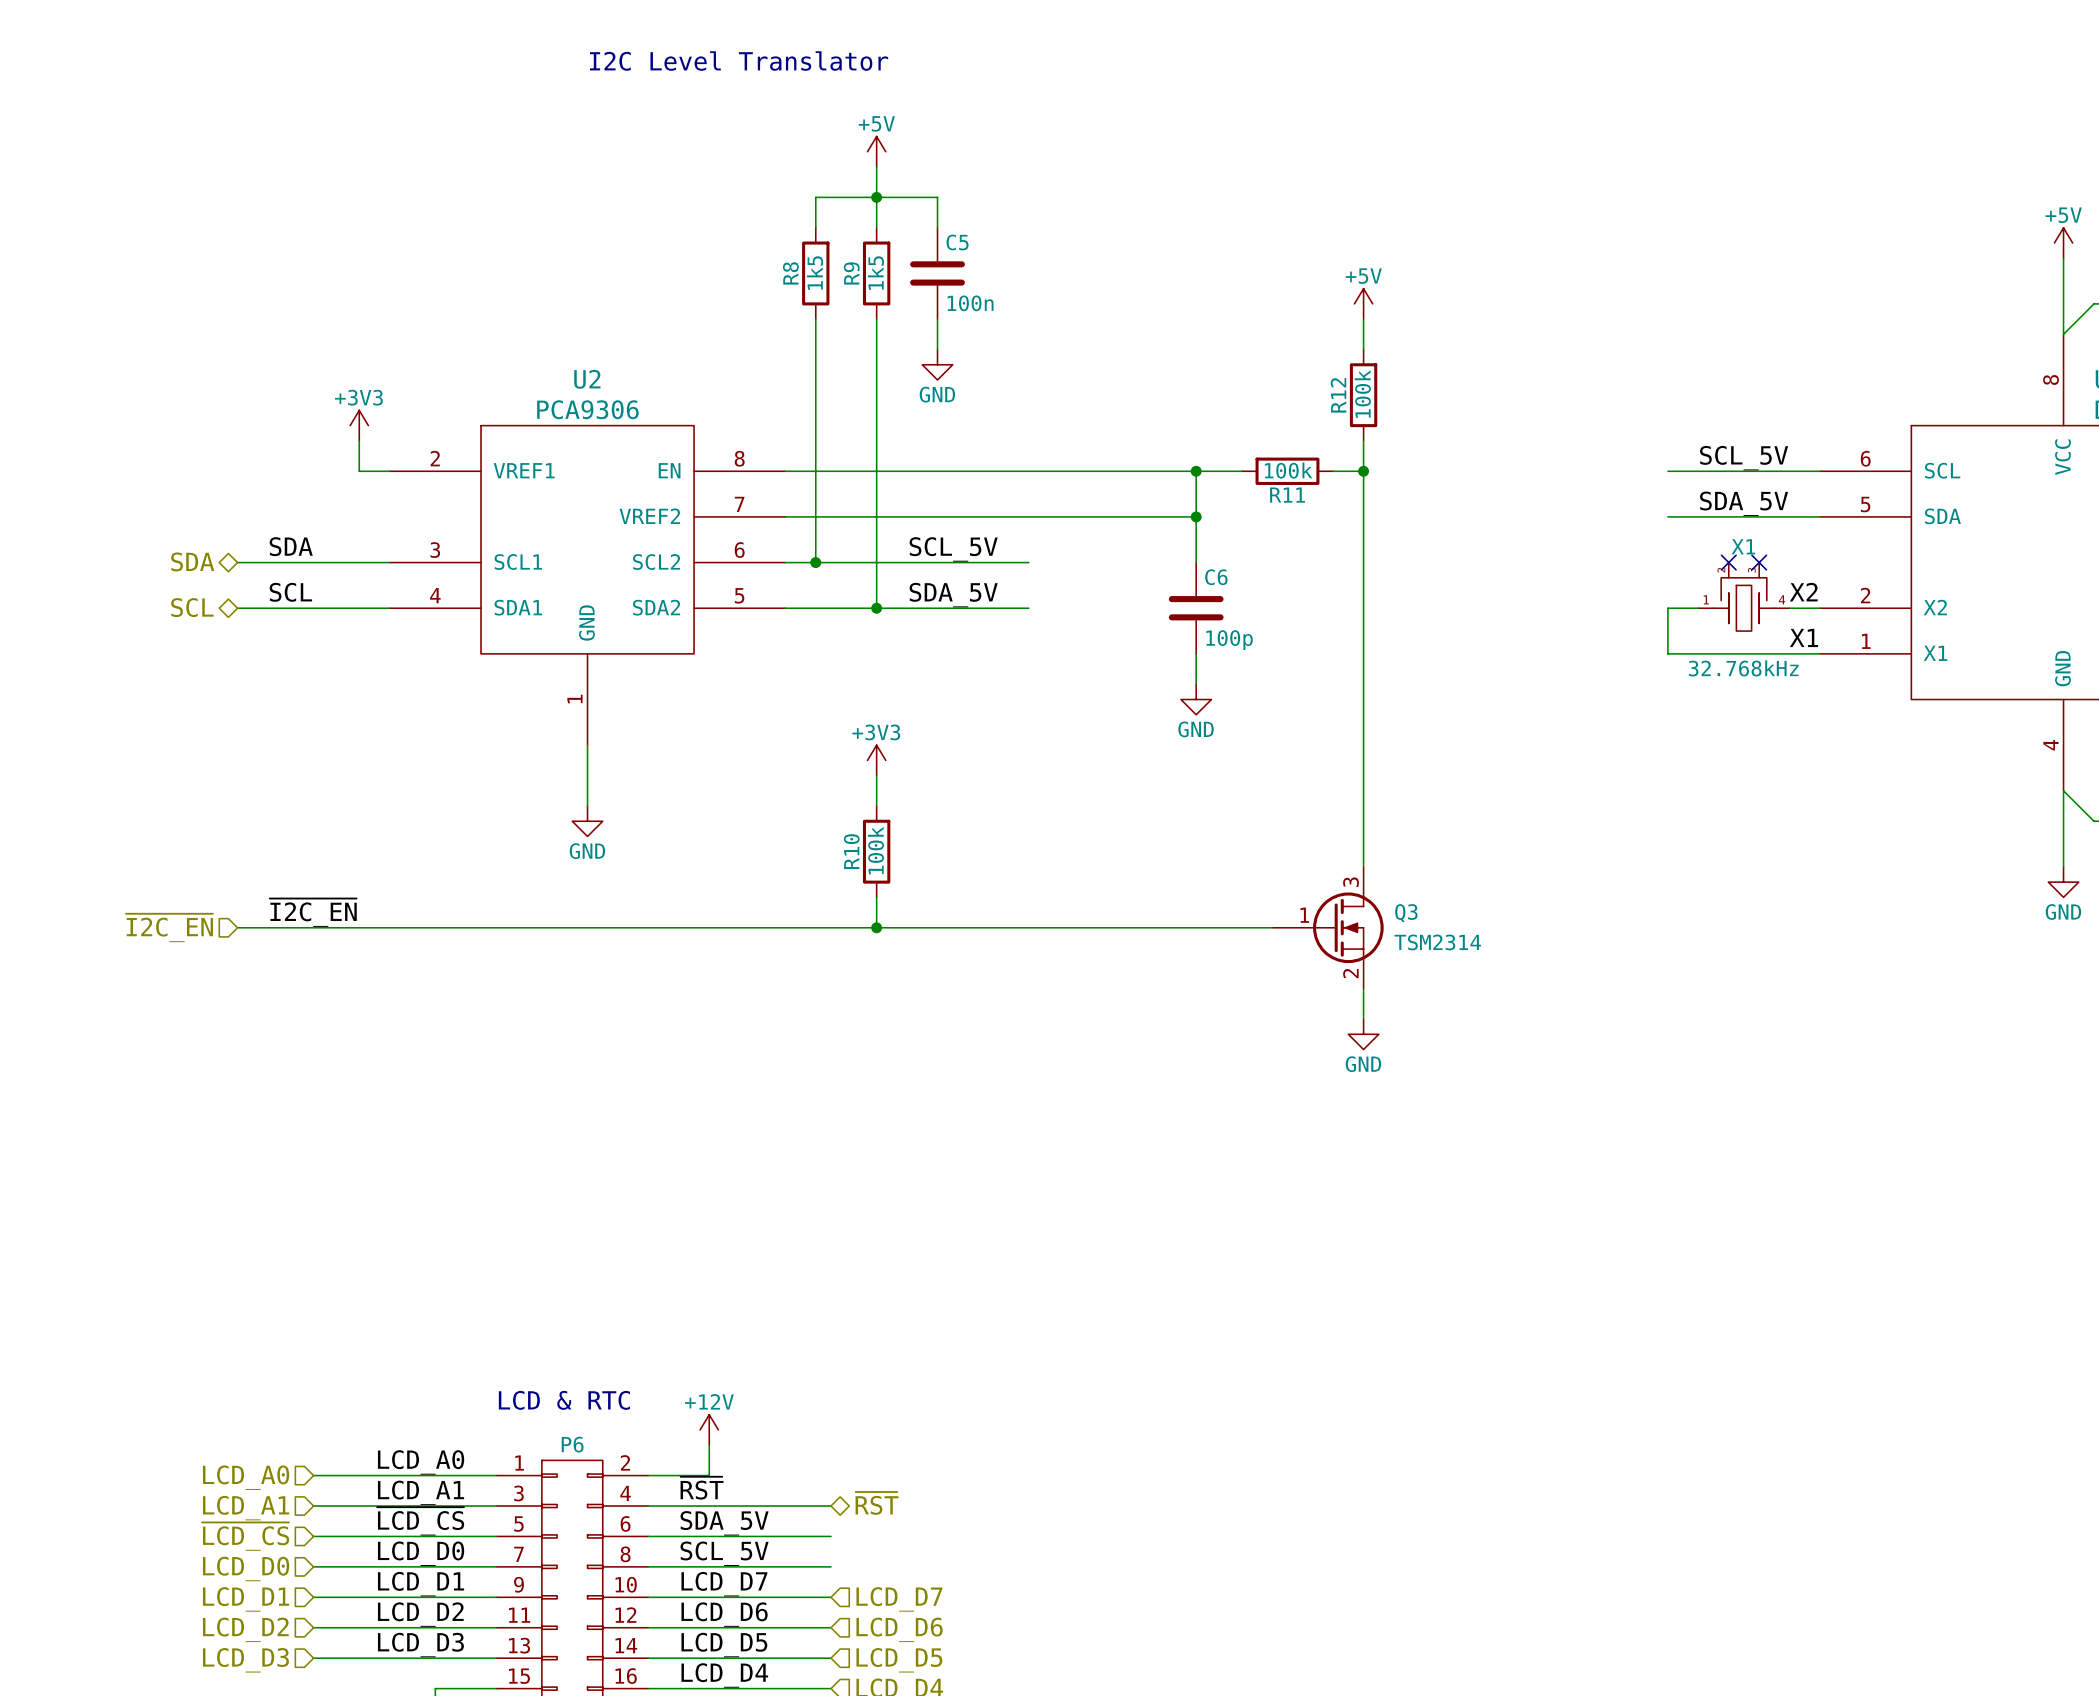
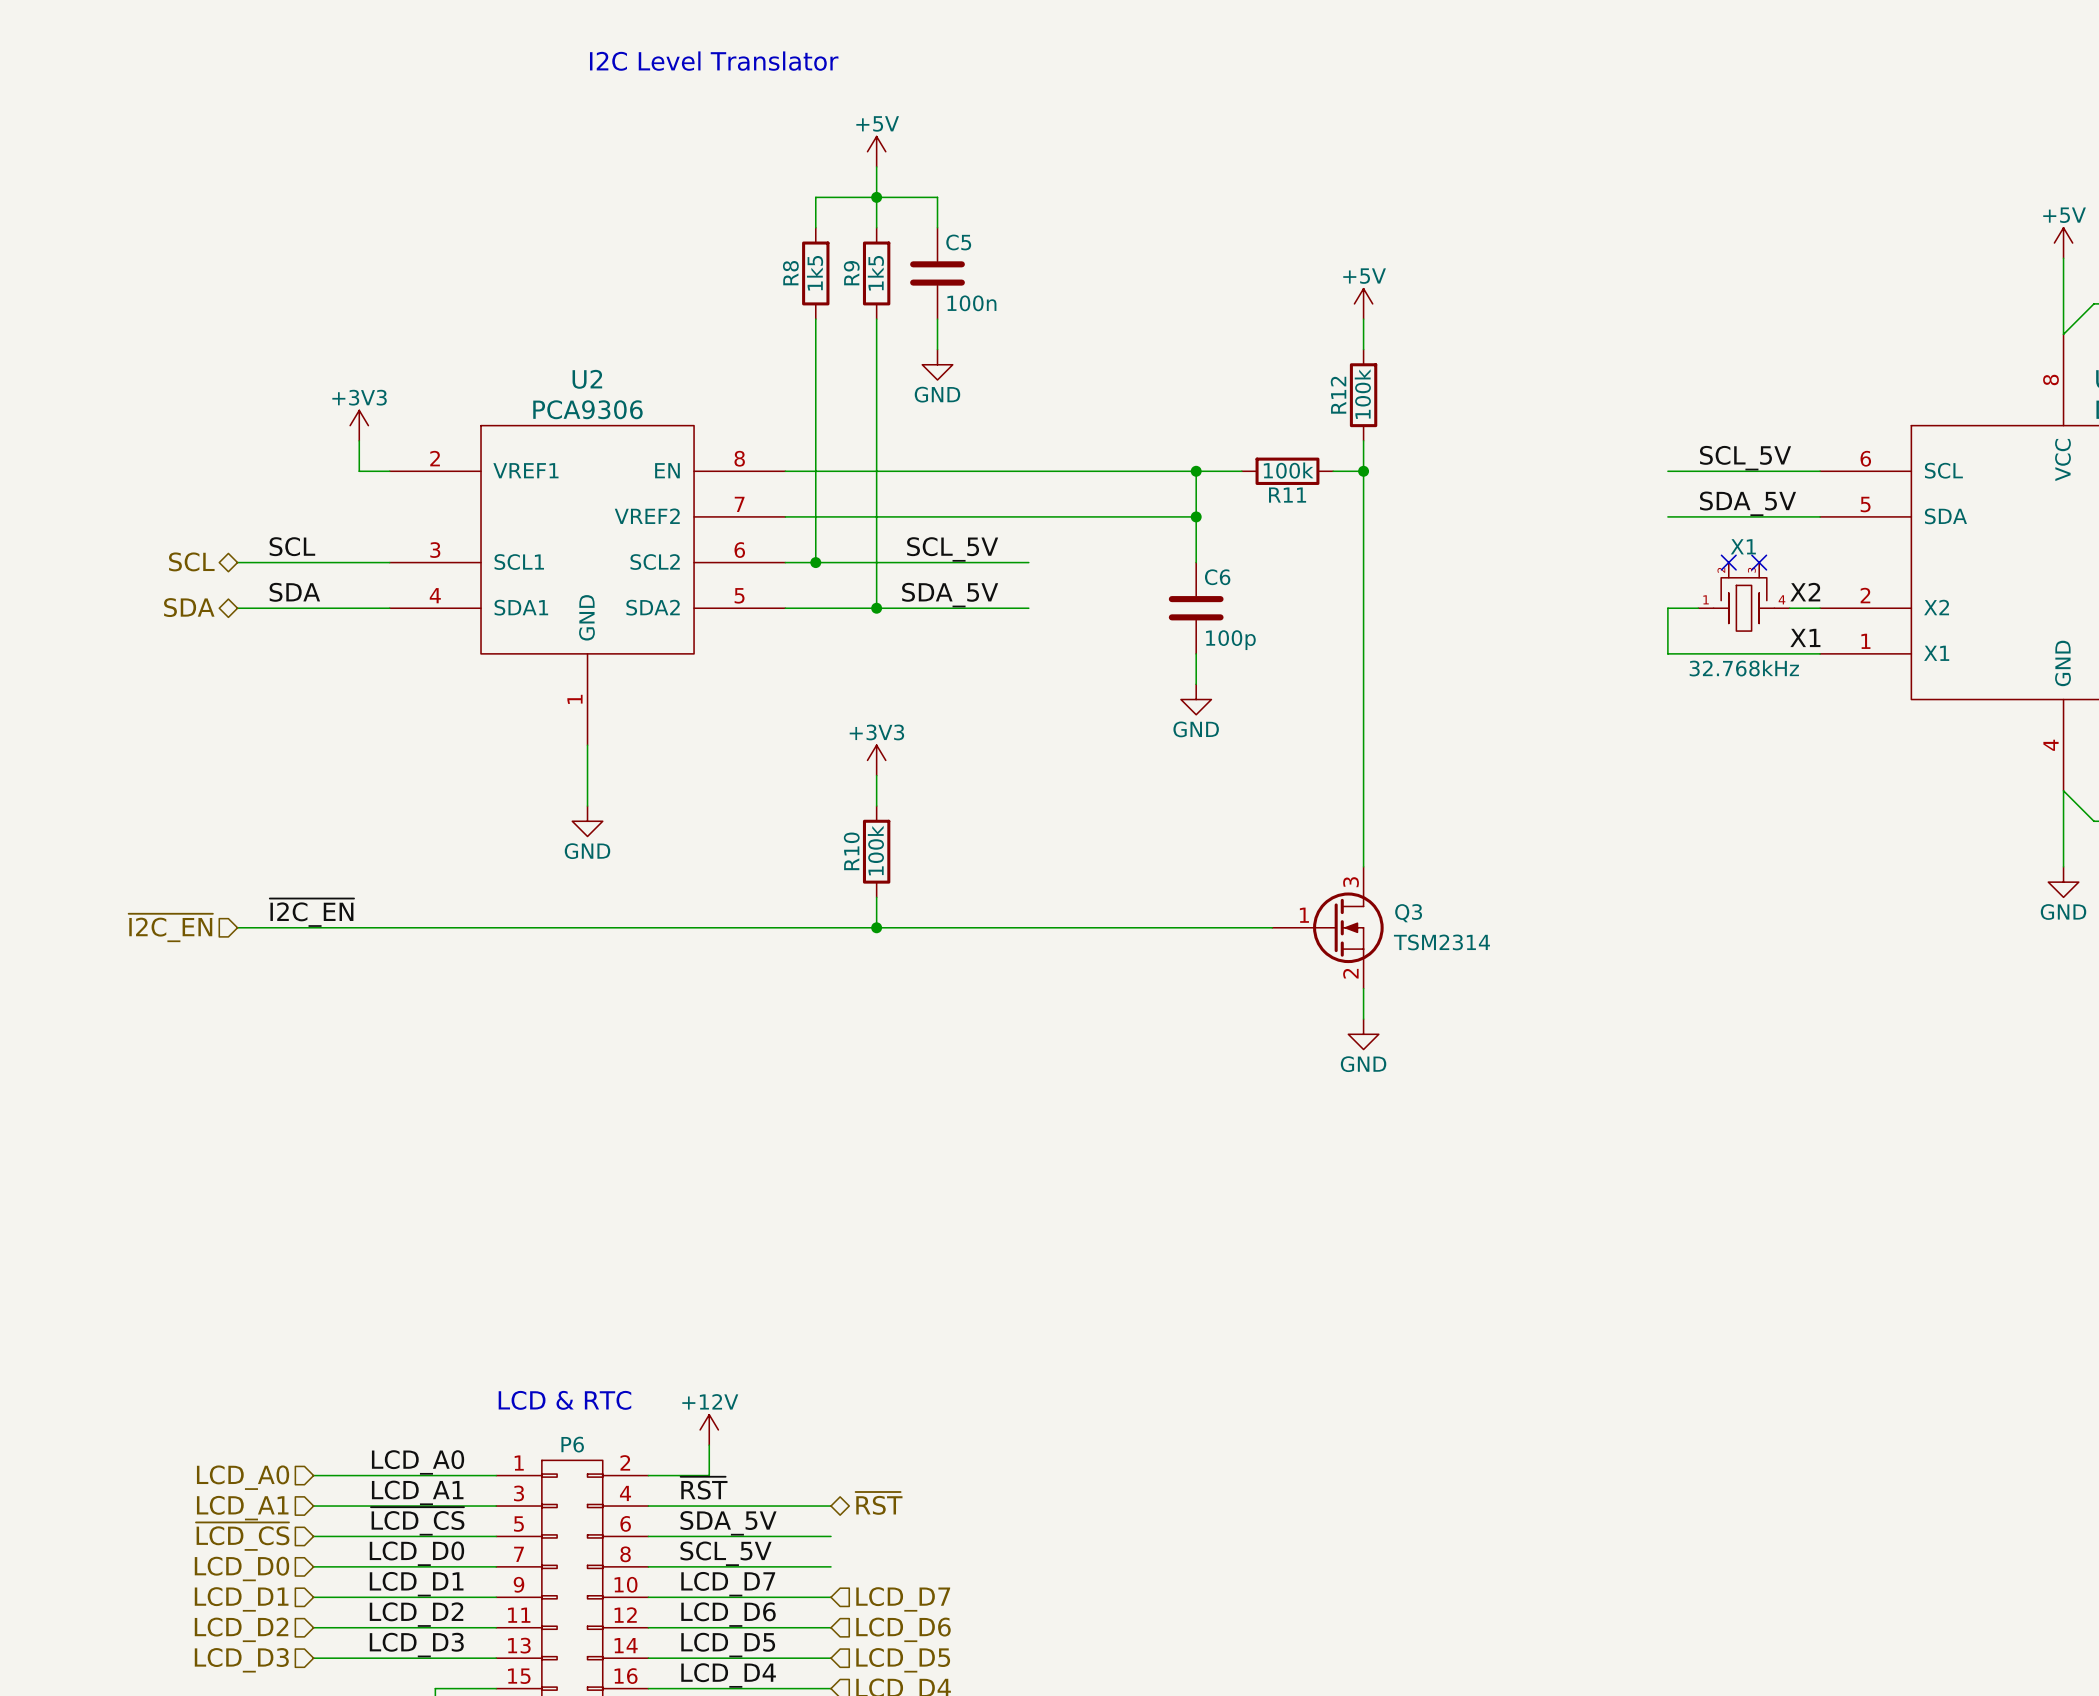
label: SDA (291, 546) -> SCL (292, 546)
hierarchical label: SDA (192, 561) -> SCL (191, 561)
label: SCL (290, 592) -> SDA (294, 592)
hierarchical label: SCL (192, 607) -> SDA (189, 607)

